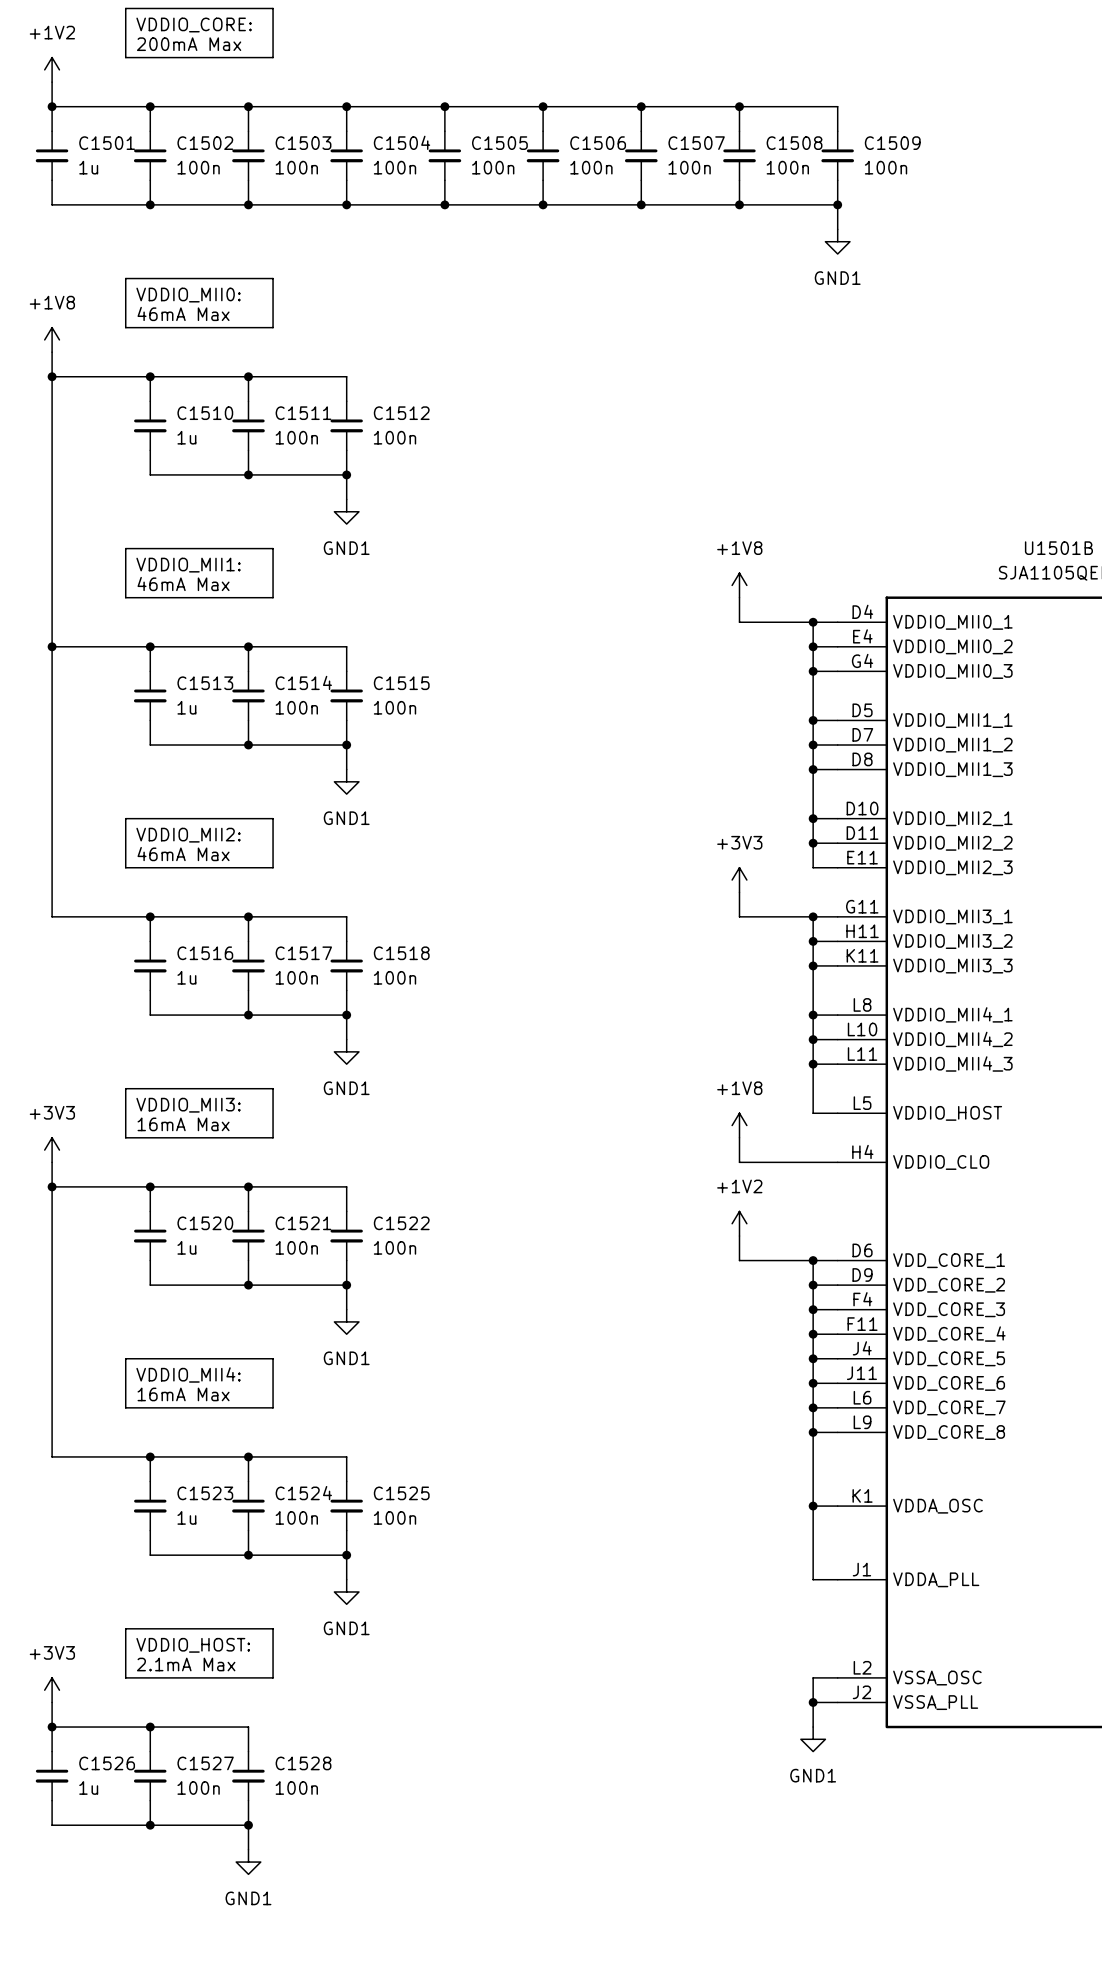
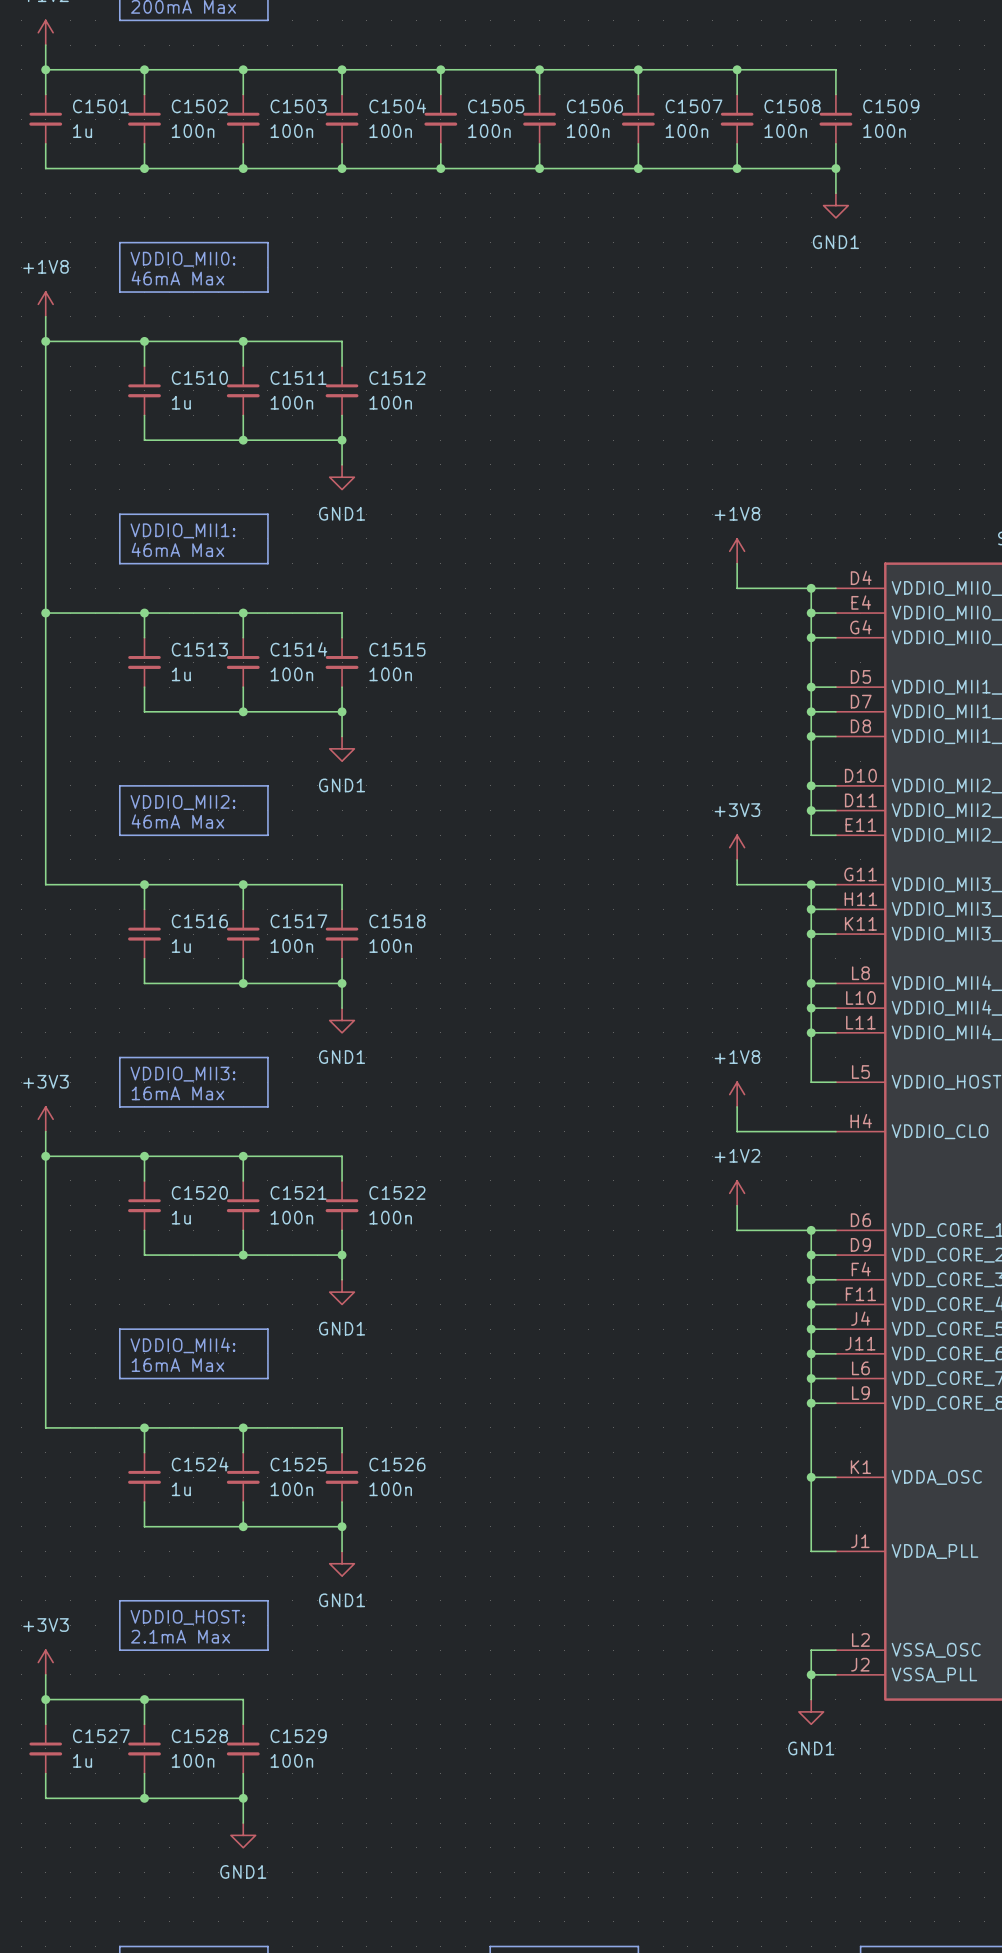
C1523 name: C1523 (205, 1493) -> C1524 (200, 1464)
C1524 name: C1524 (303, 1493) -> C1525 (298, 1464)
C1525 name: C1525 (401, 1493) -> C1526 (397, 1464)
C1526 name: C1526 (107, 1763) -> C1527 (101, 1736)
C1527 name: C1527 (205, 1763) -> C1528 (199, 1736)
C1528 name: C1528 (303, 1763) -> C1529 (298, 1736)

